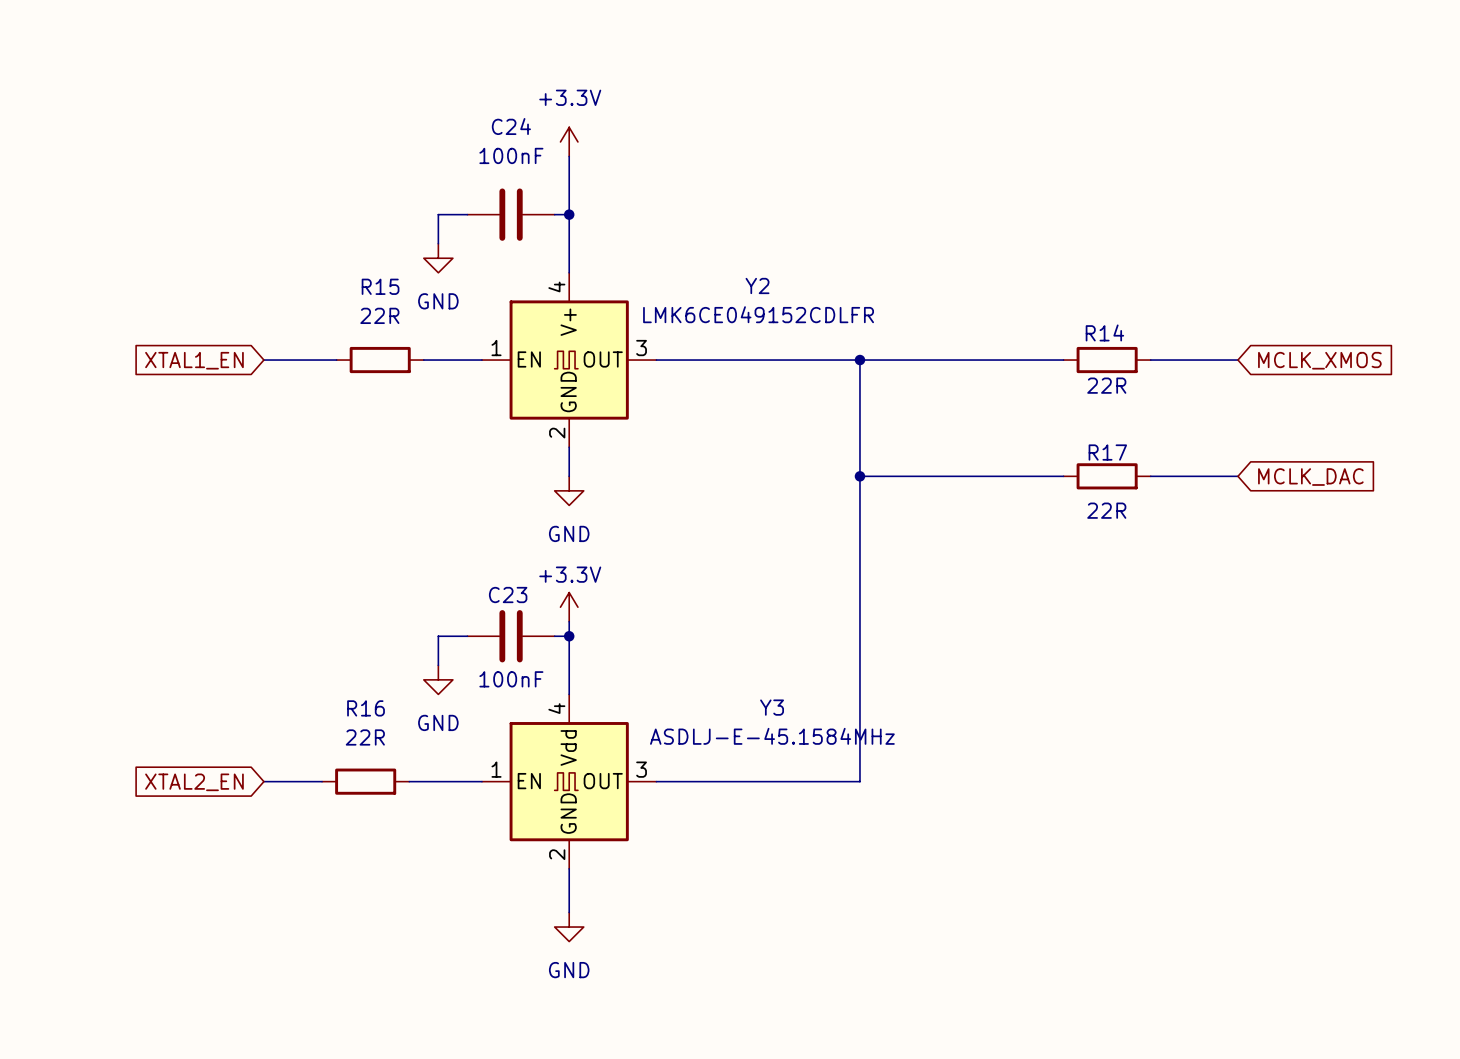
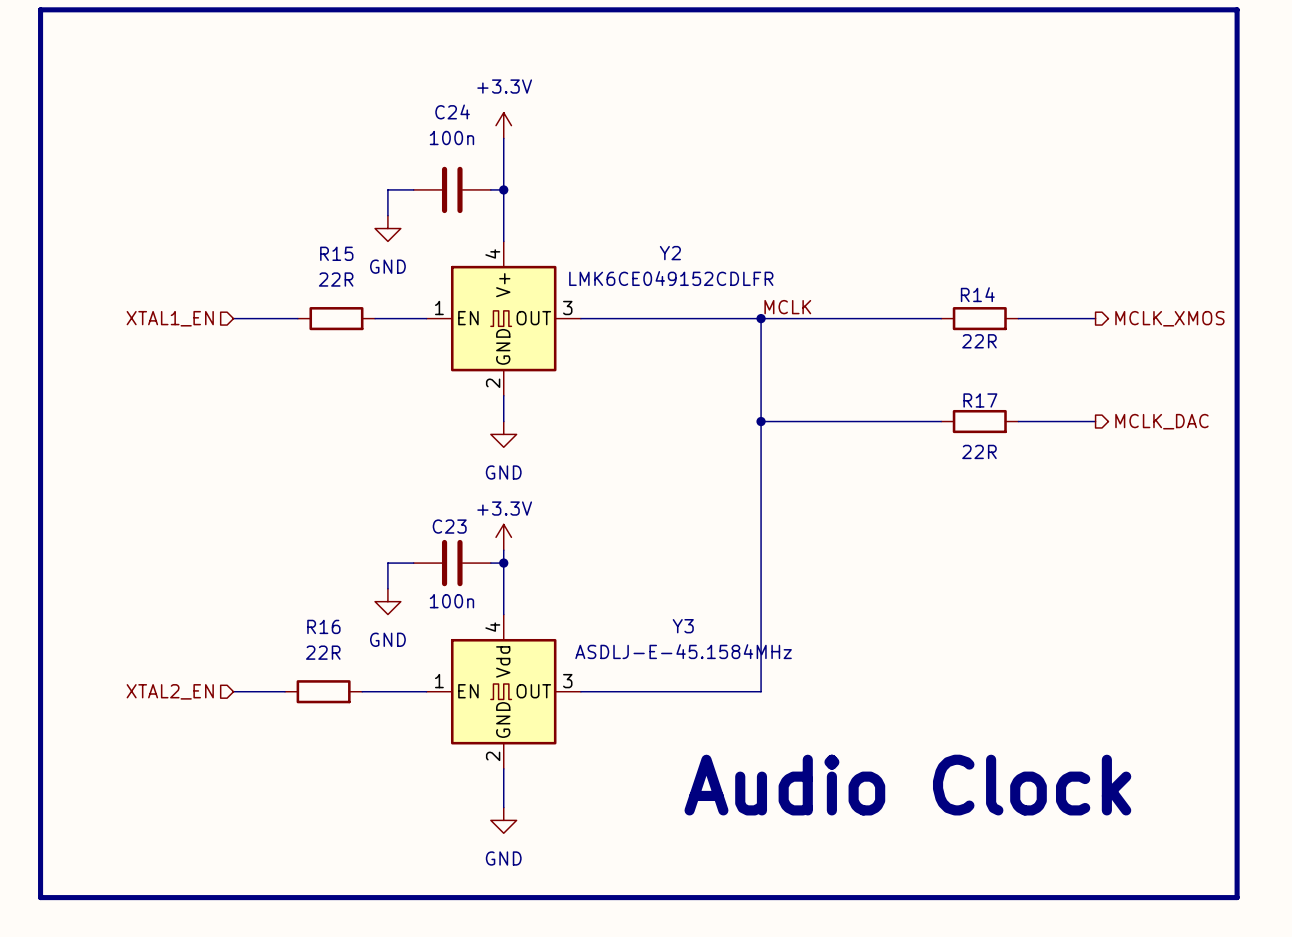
line: none -> (40, 9) (1237, 9) (1237, 897) (40, 897) (40, 9)
C24 value: 100nF (511, 155) -> 100n (451, 138)
label: none -> MCLK (787, 307)
hierarchical label: none -> XTAL1_EN (170, 318)
global label: XTAL1_EN (194, 360) -> none
global label: MCLK_XMOS (1319, 360) -> none
hierarchical label: none -> MCLK_XMOS (1169, 318)
hierarchical label: none -> MCLK_DAC (1161, 421)
global label: MCLK_DAC (1310, 477) -> none
C23 value: 100nF (511, 679) -> 100n (451, 601)
hierarchical label: none -> XTAL2_EN (170, 691)
global label: XTAL2_EN (194, 782) -> none
text: none -> Audio Clock (907, 785)

